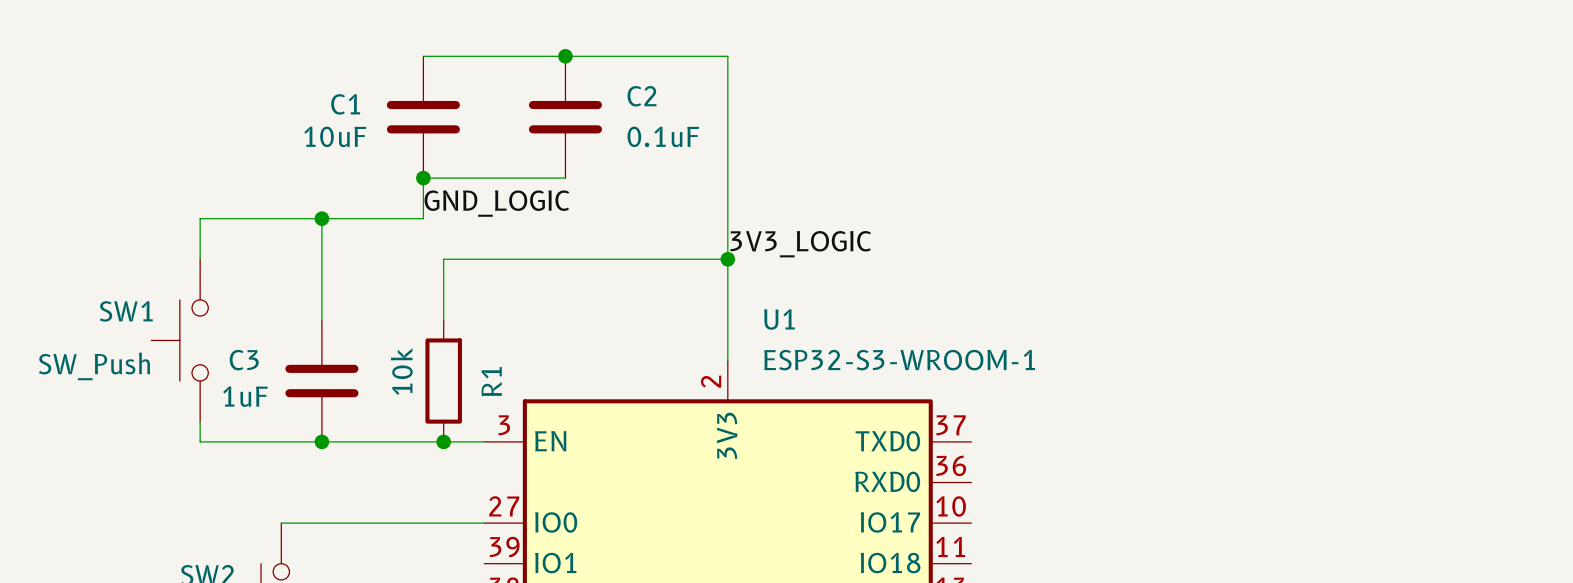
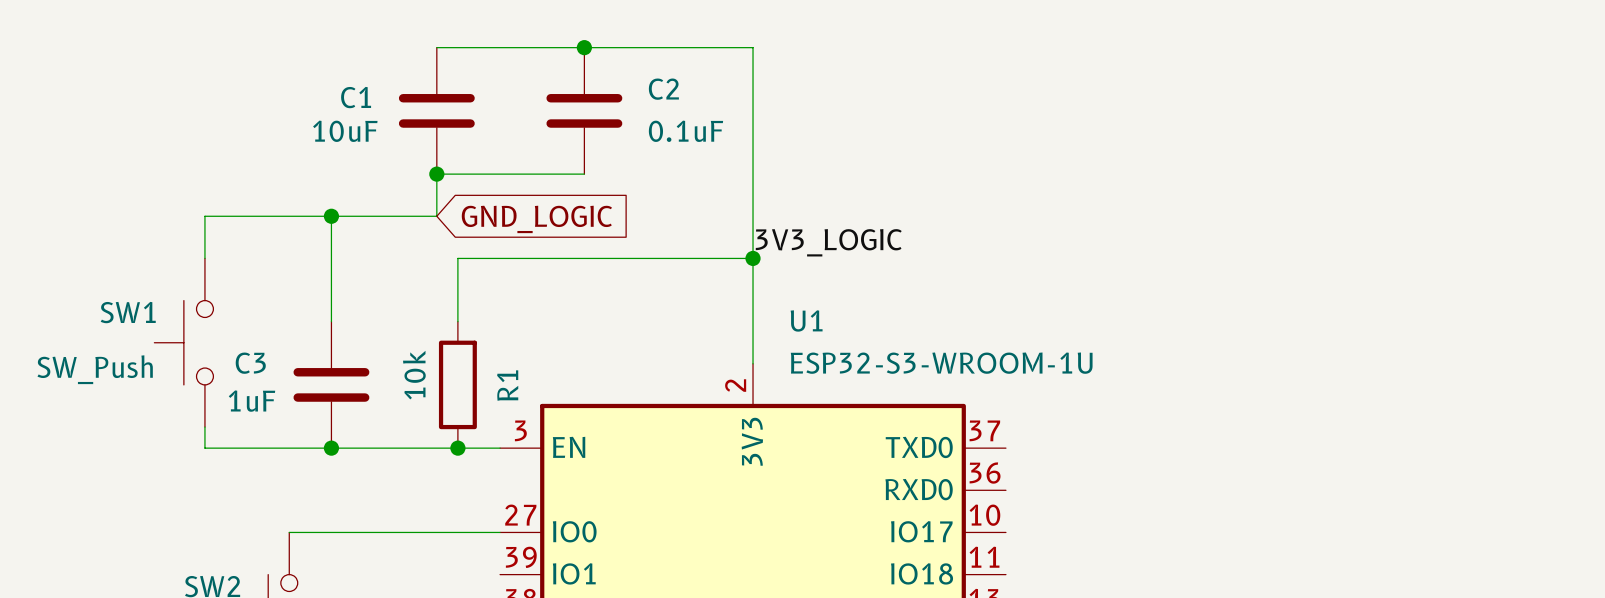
label: GND_LOGIC (496, 203) -> none
global label: none -> GND_LOGIC (536, 219)
U1 value: ESP32-S3-WROOM-1 (899, 360) -> ESP32-S3-WROOM-1U (941, 363)

